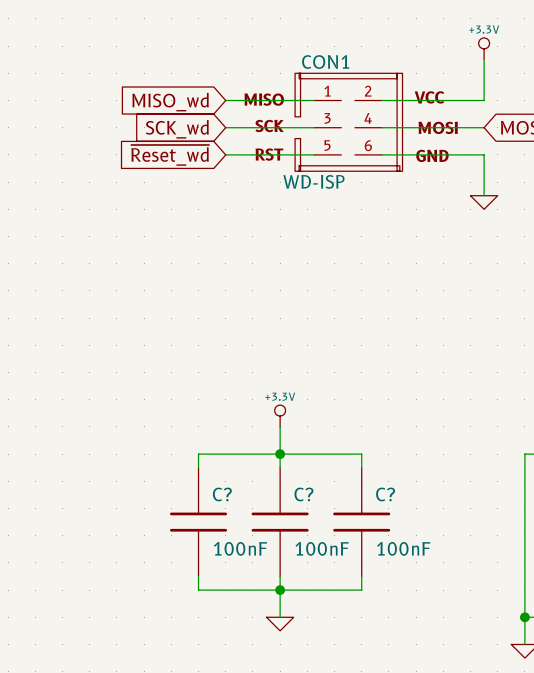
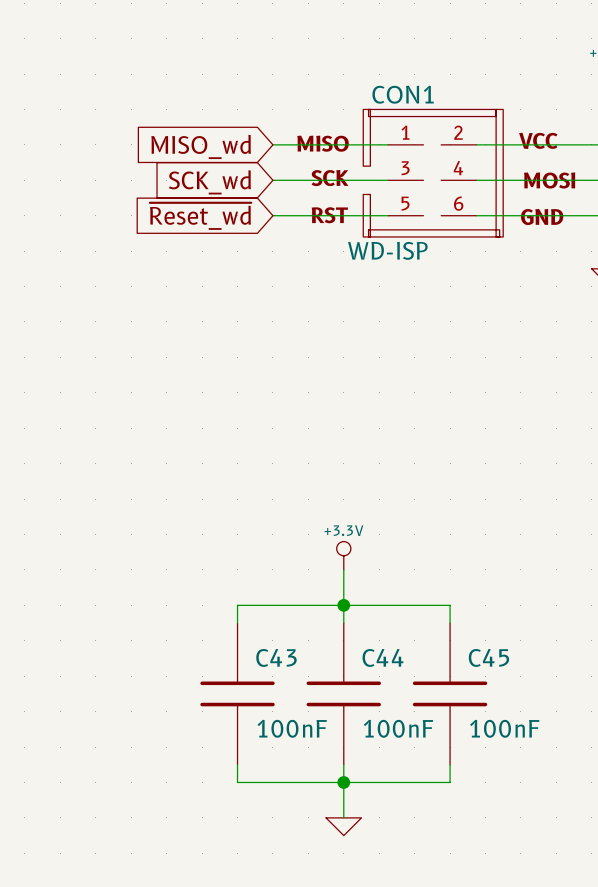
C? name: C? (222, 494) -> C43 (276, 657)
C? name: C? (303, 494) -> C44 (382, 657)
C? name: C? (385, 494) -> C45 (488, 657)

